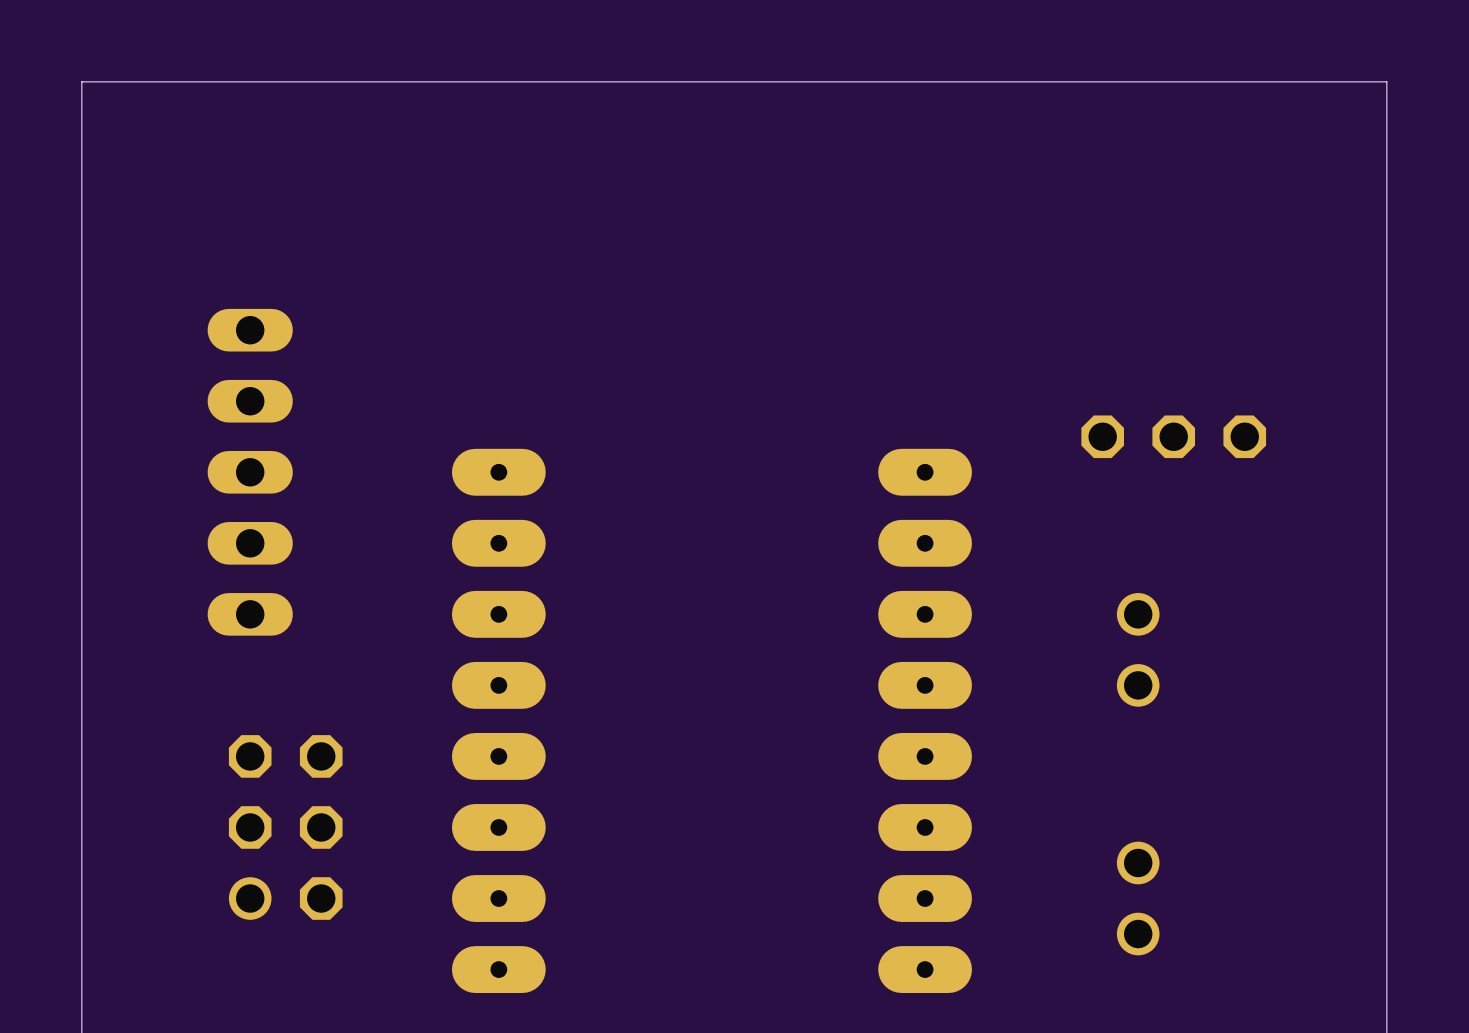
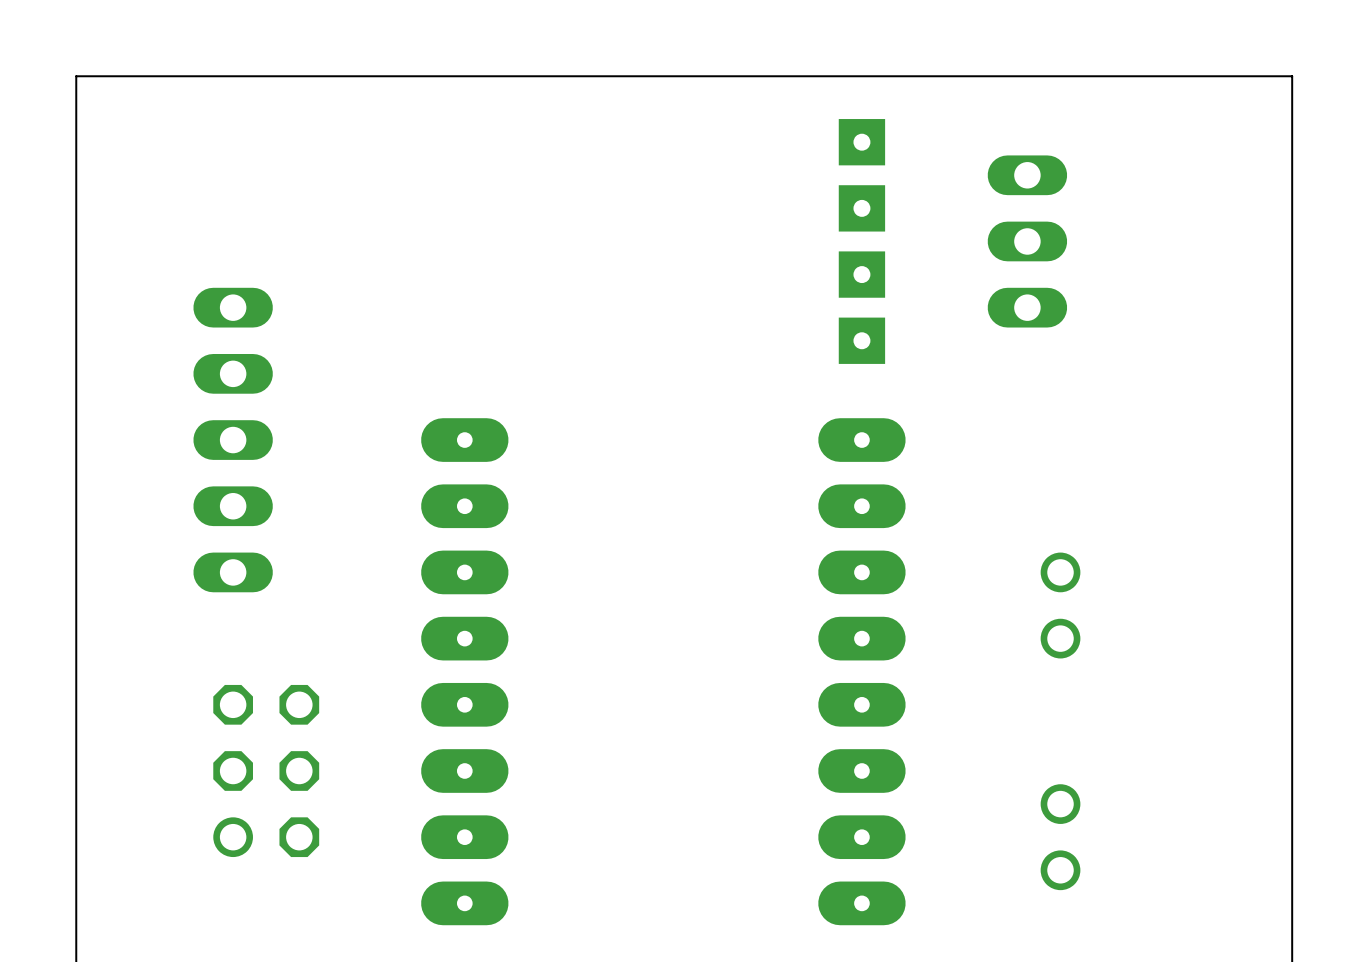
part: none -> (861, 241)
part: none -> (1027, 241)
part: (1173, 436) -> none

